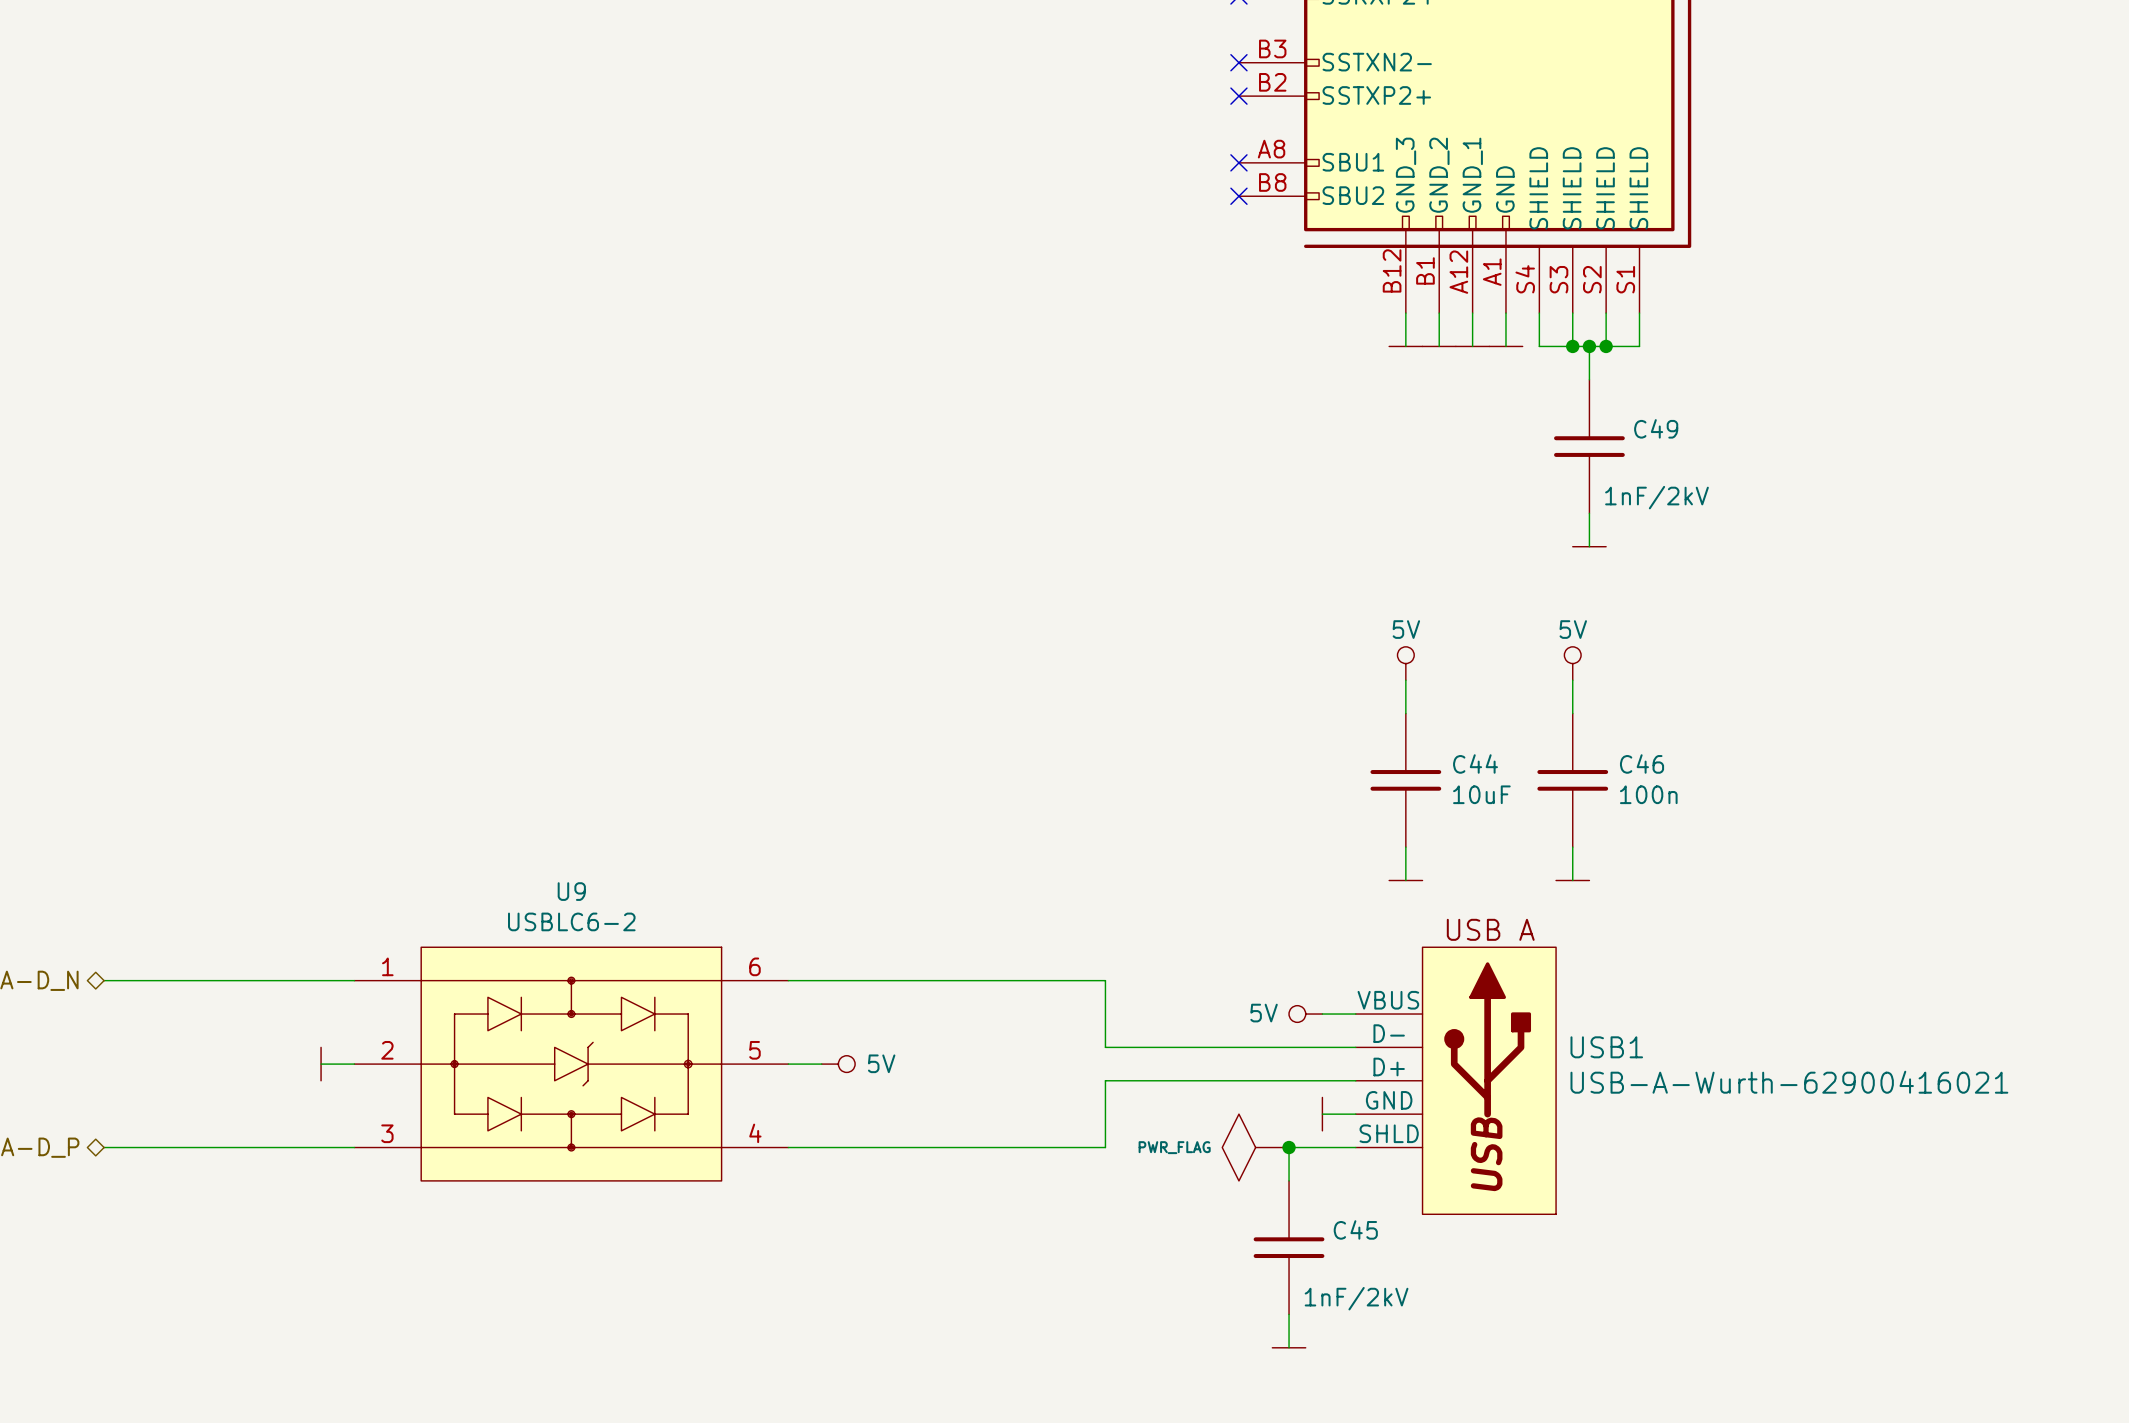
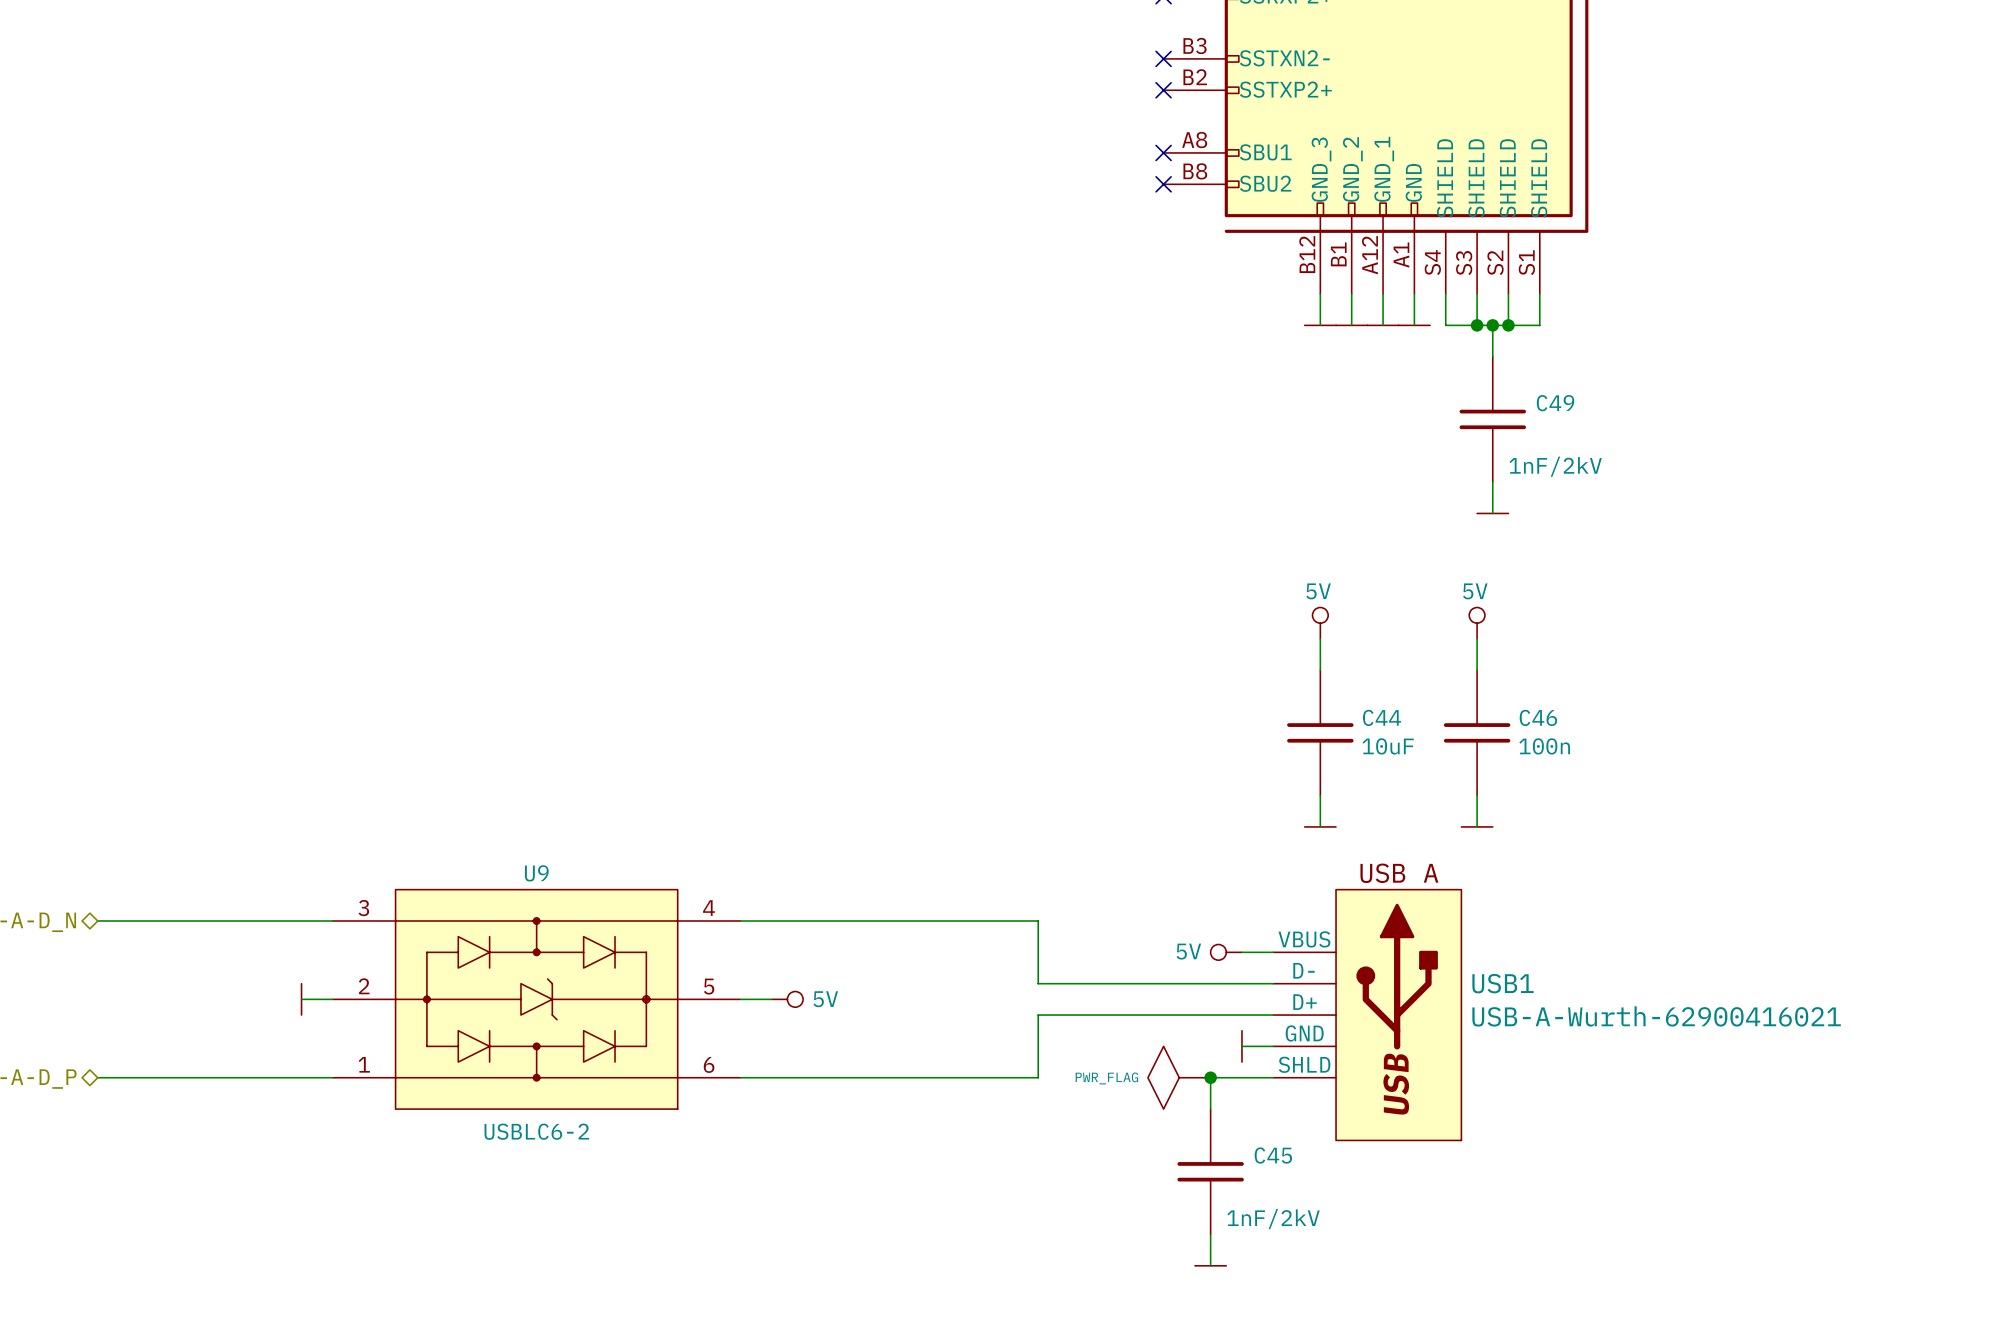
U9 name position: U9 (571, 891) -> U9 (536, 873)
U9 flip: as is (571, 1064) -> up-down (536, 999)

